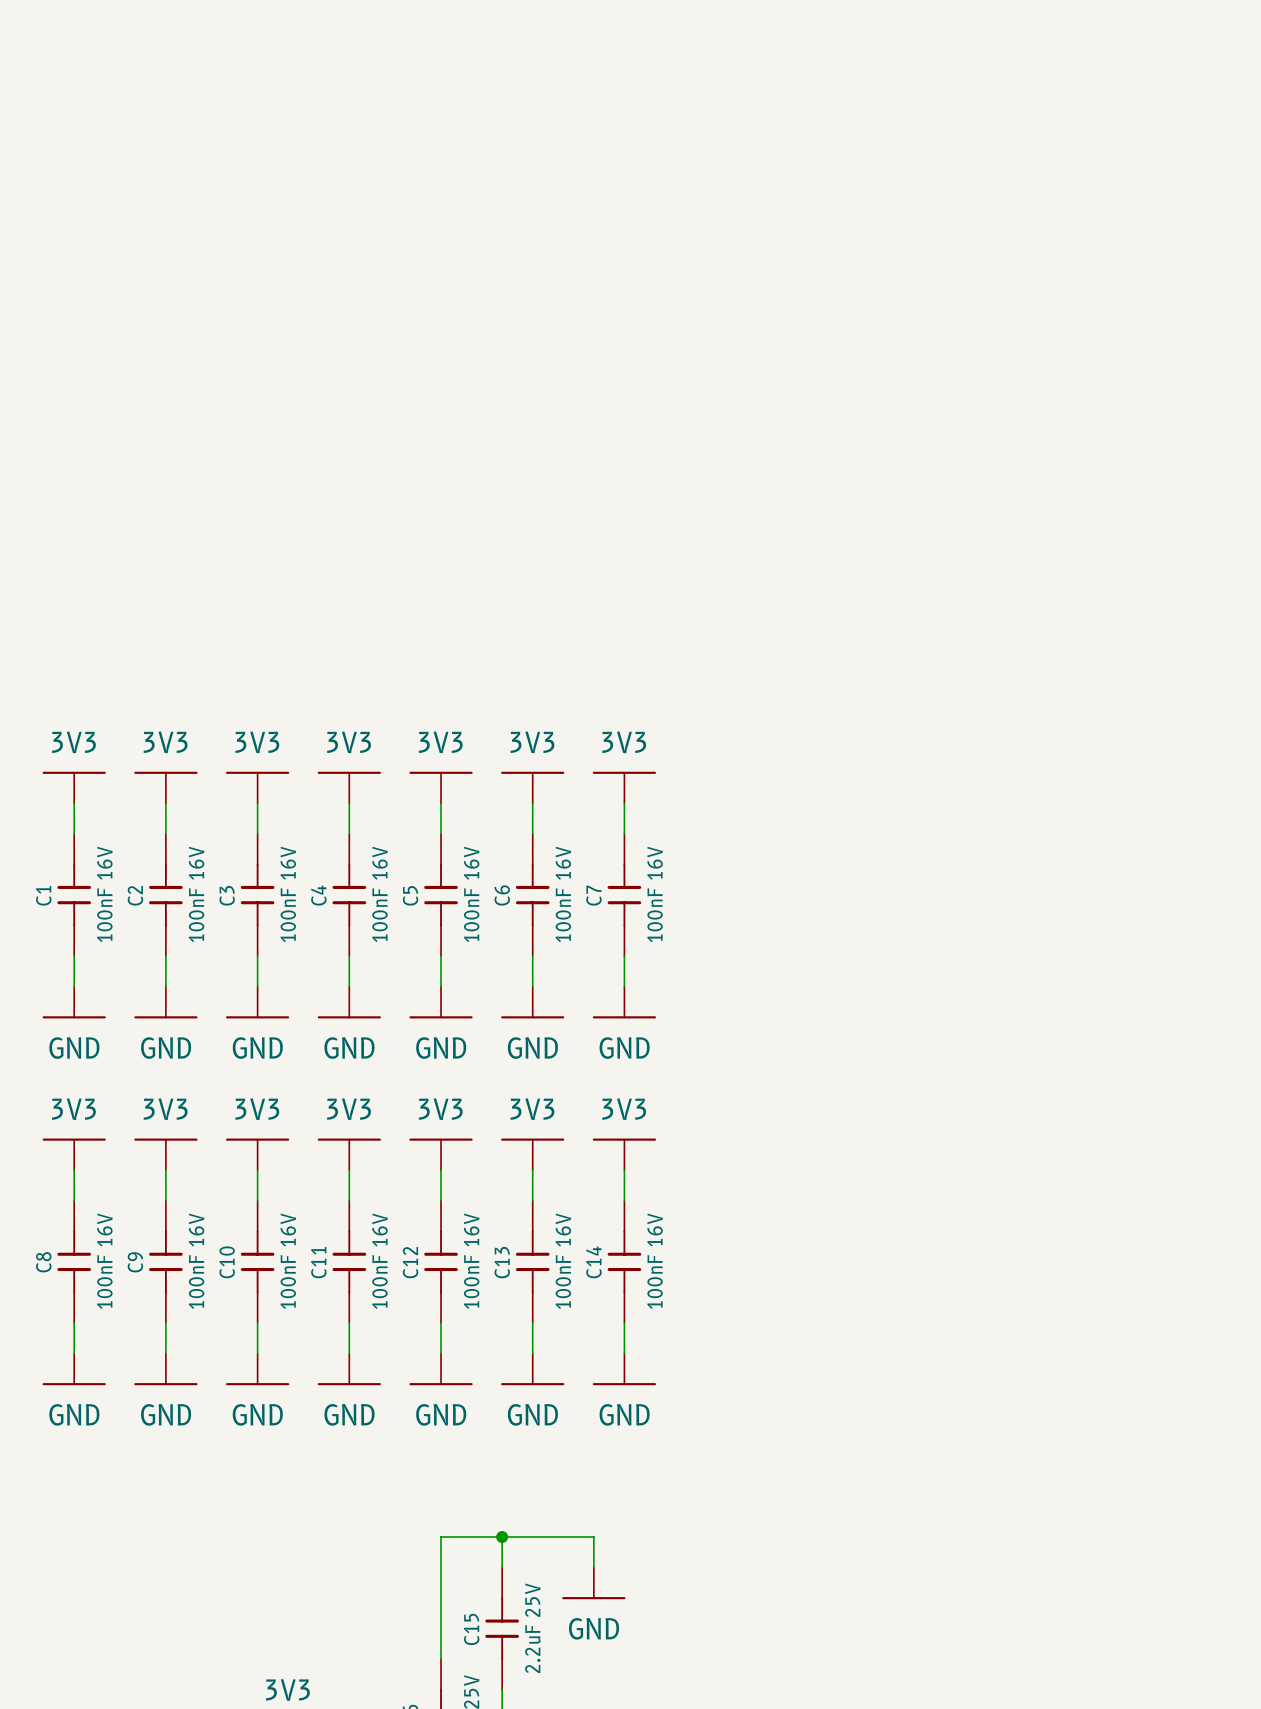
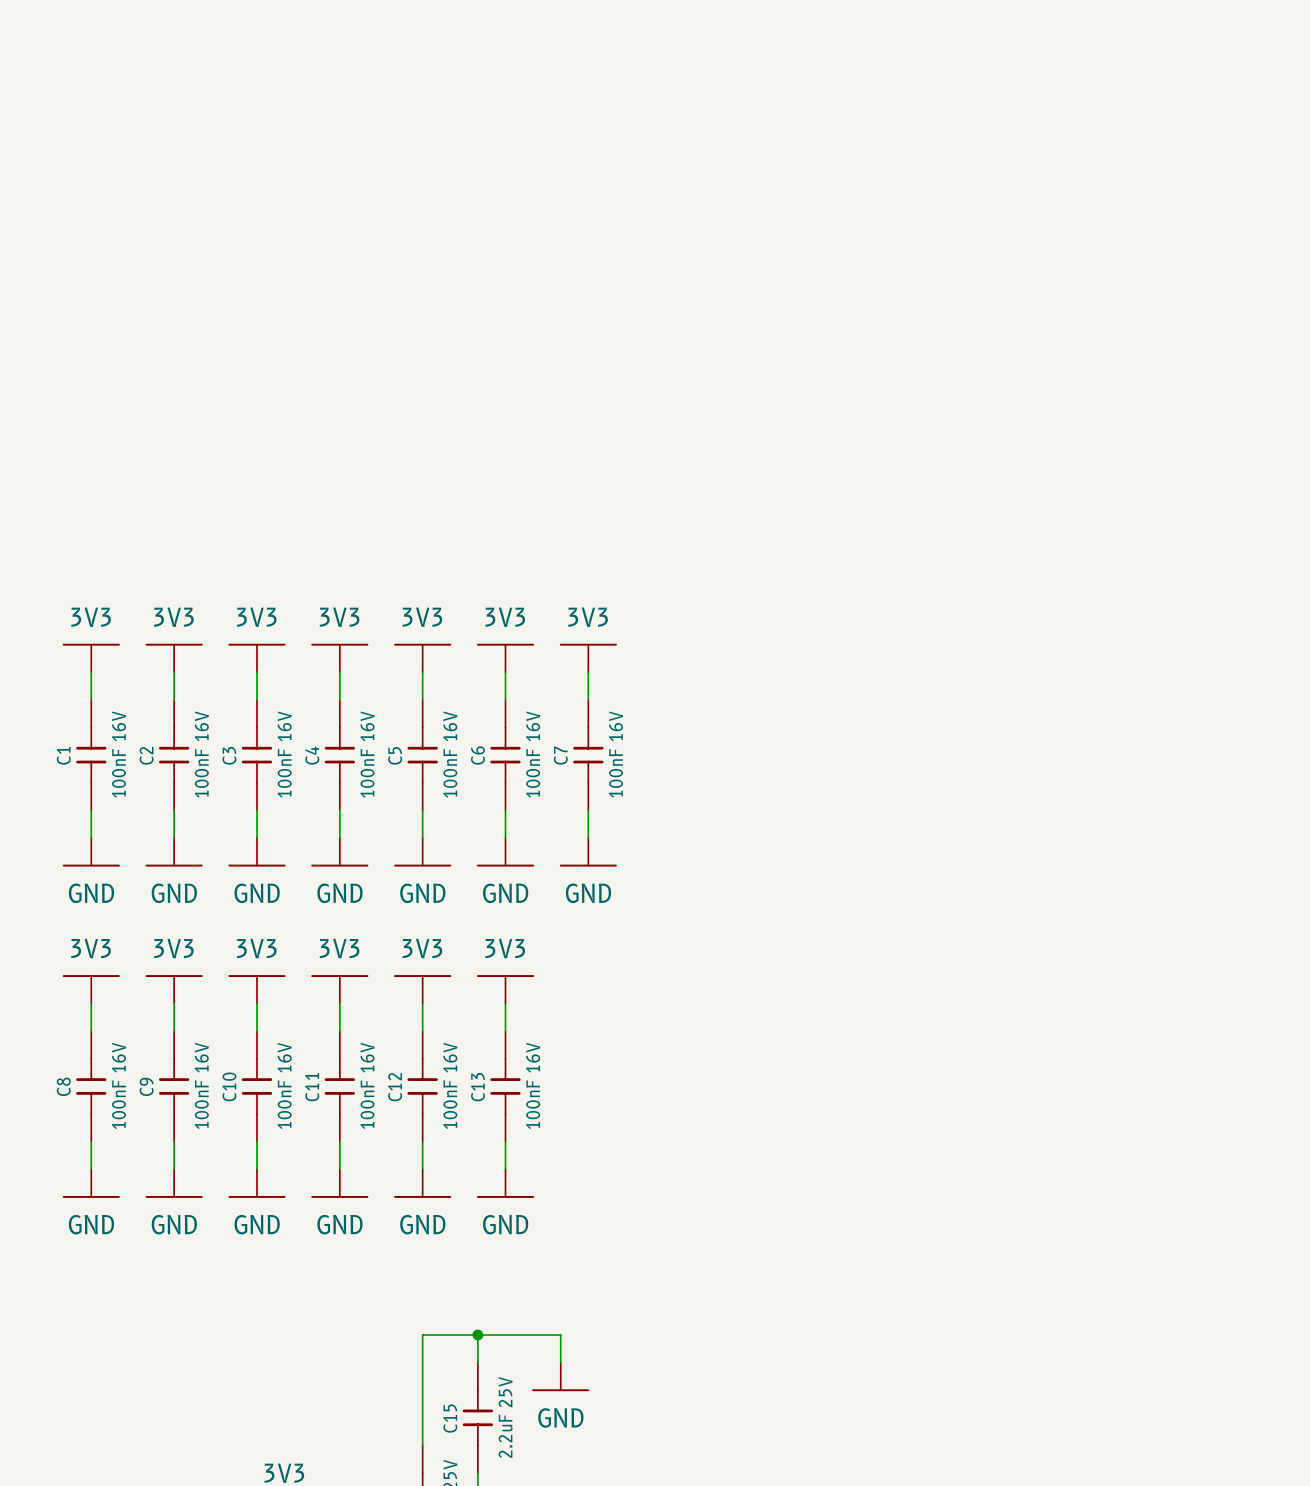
power symbol: 3V3 (624, 1154) -> none
wire: (624, 1170) (624, 1200) -> none
C14: 100nF 16V (624, 1261) -> none
wire: (624, 1323) (624, 1353) -> none
power symbol: GND (624, 1369) -> none

